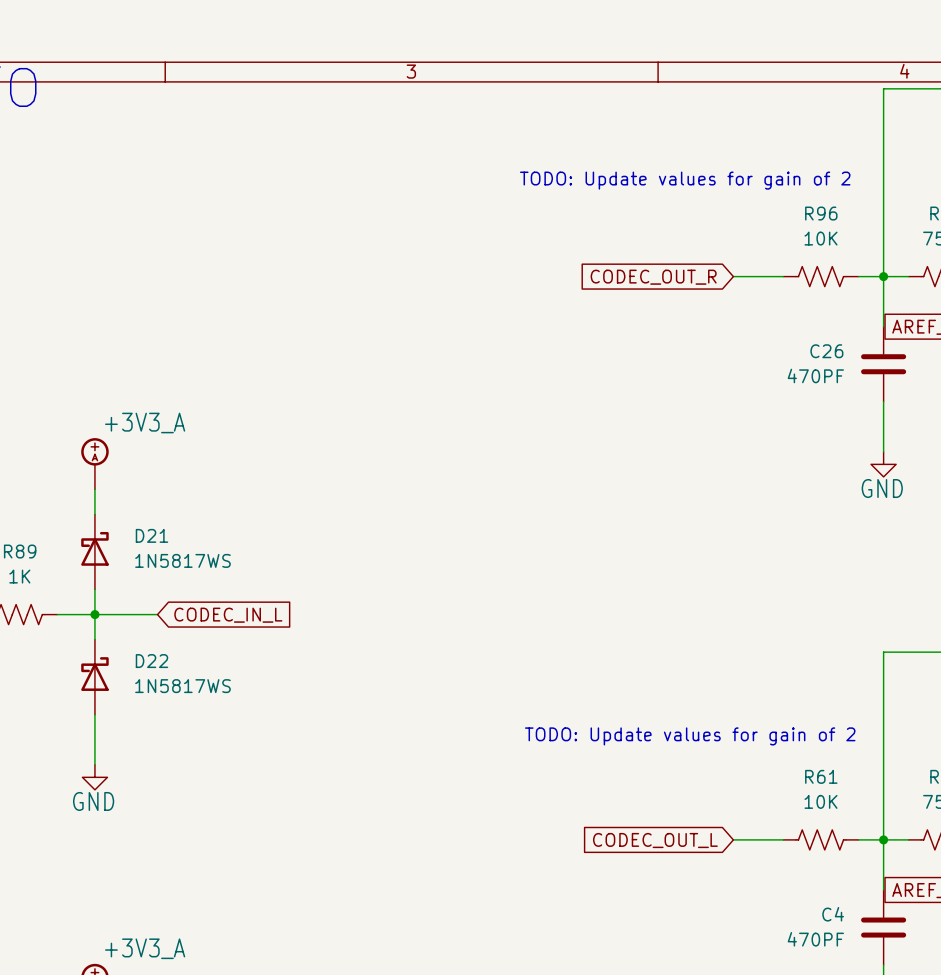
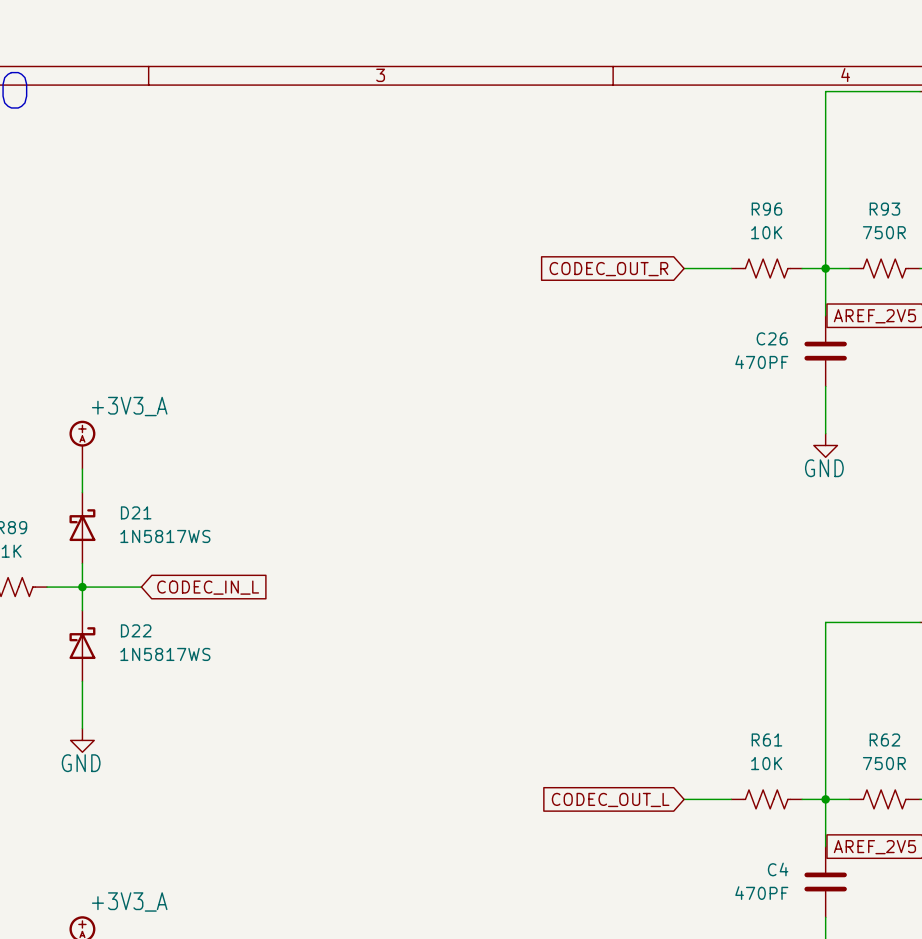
text: TODO: Update values for gain of 2 (685, 180) -> none
text: TODO: Update values for gain of 2 (690, 736) -> none

